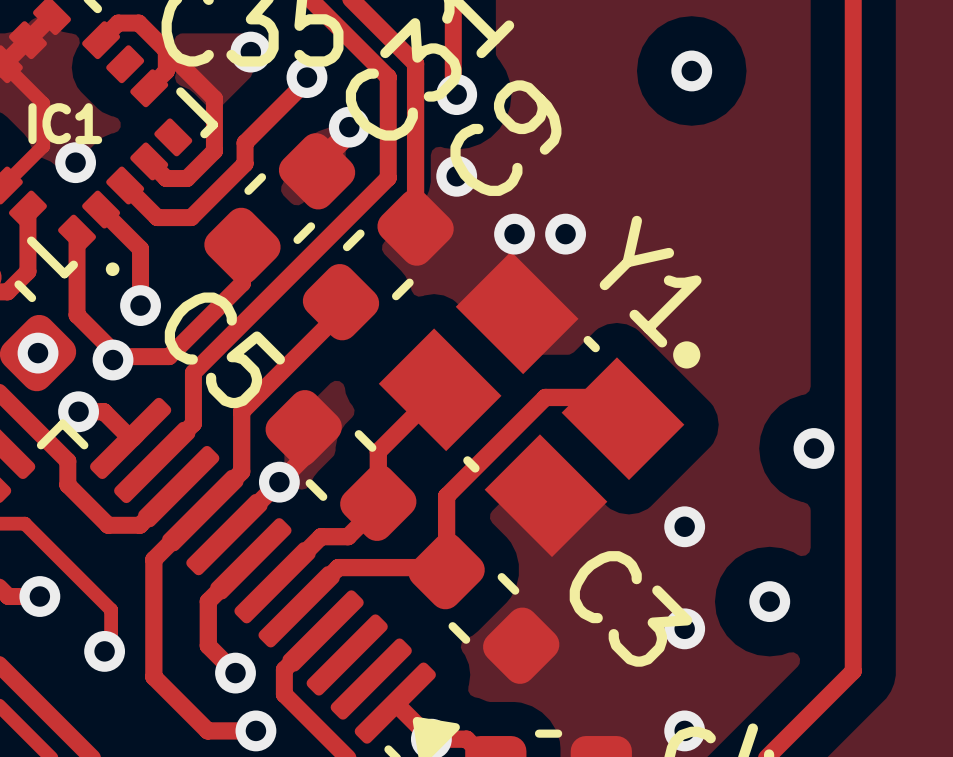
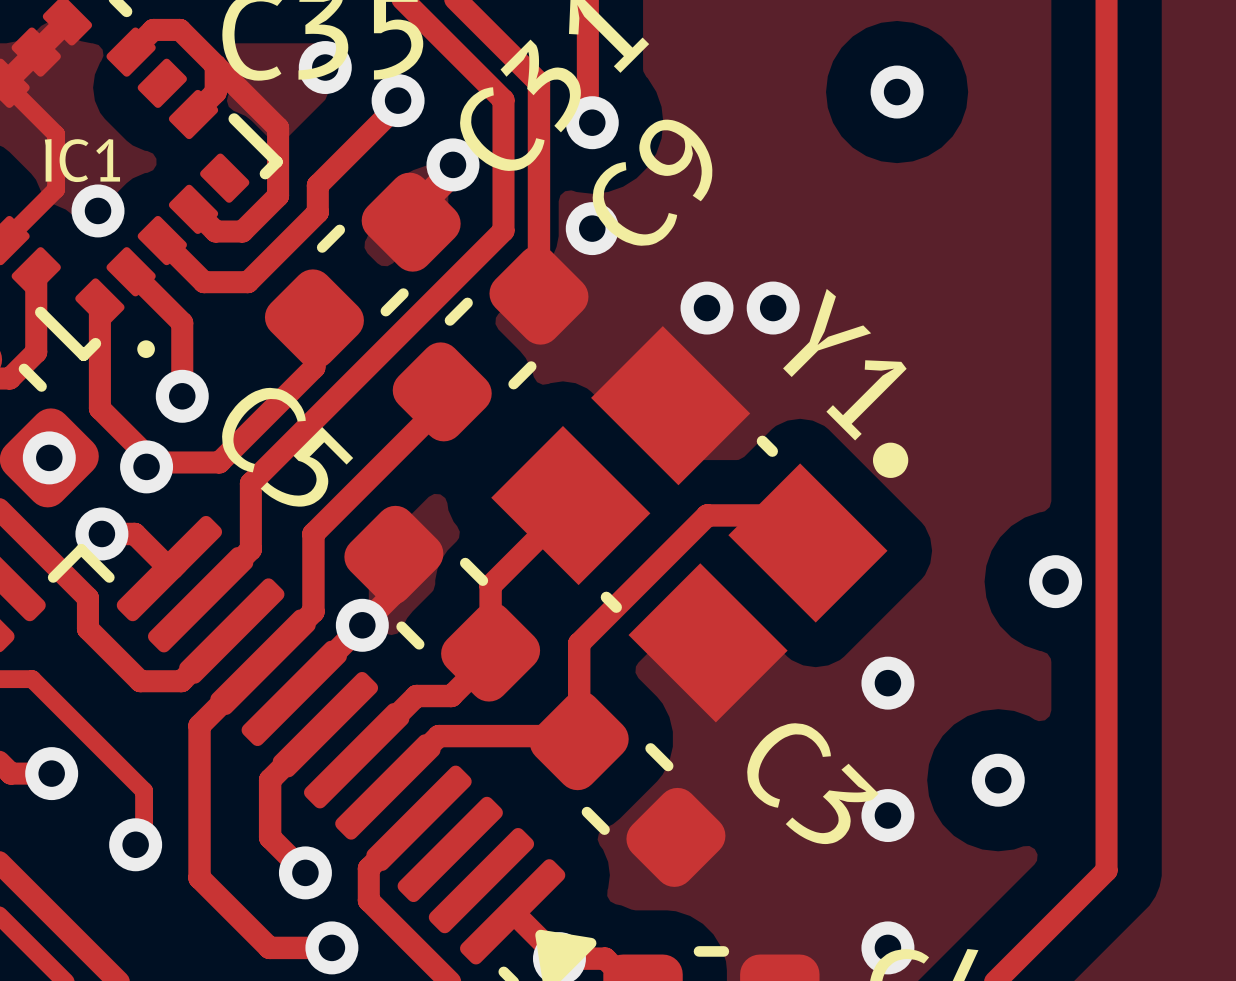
via: (514, 234) -> none
via: (565, 234) -> none
via: none -> (707, 308)
via: none -> (773, 308)

